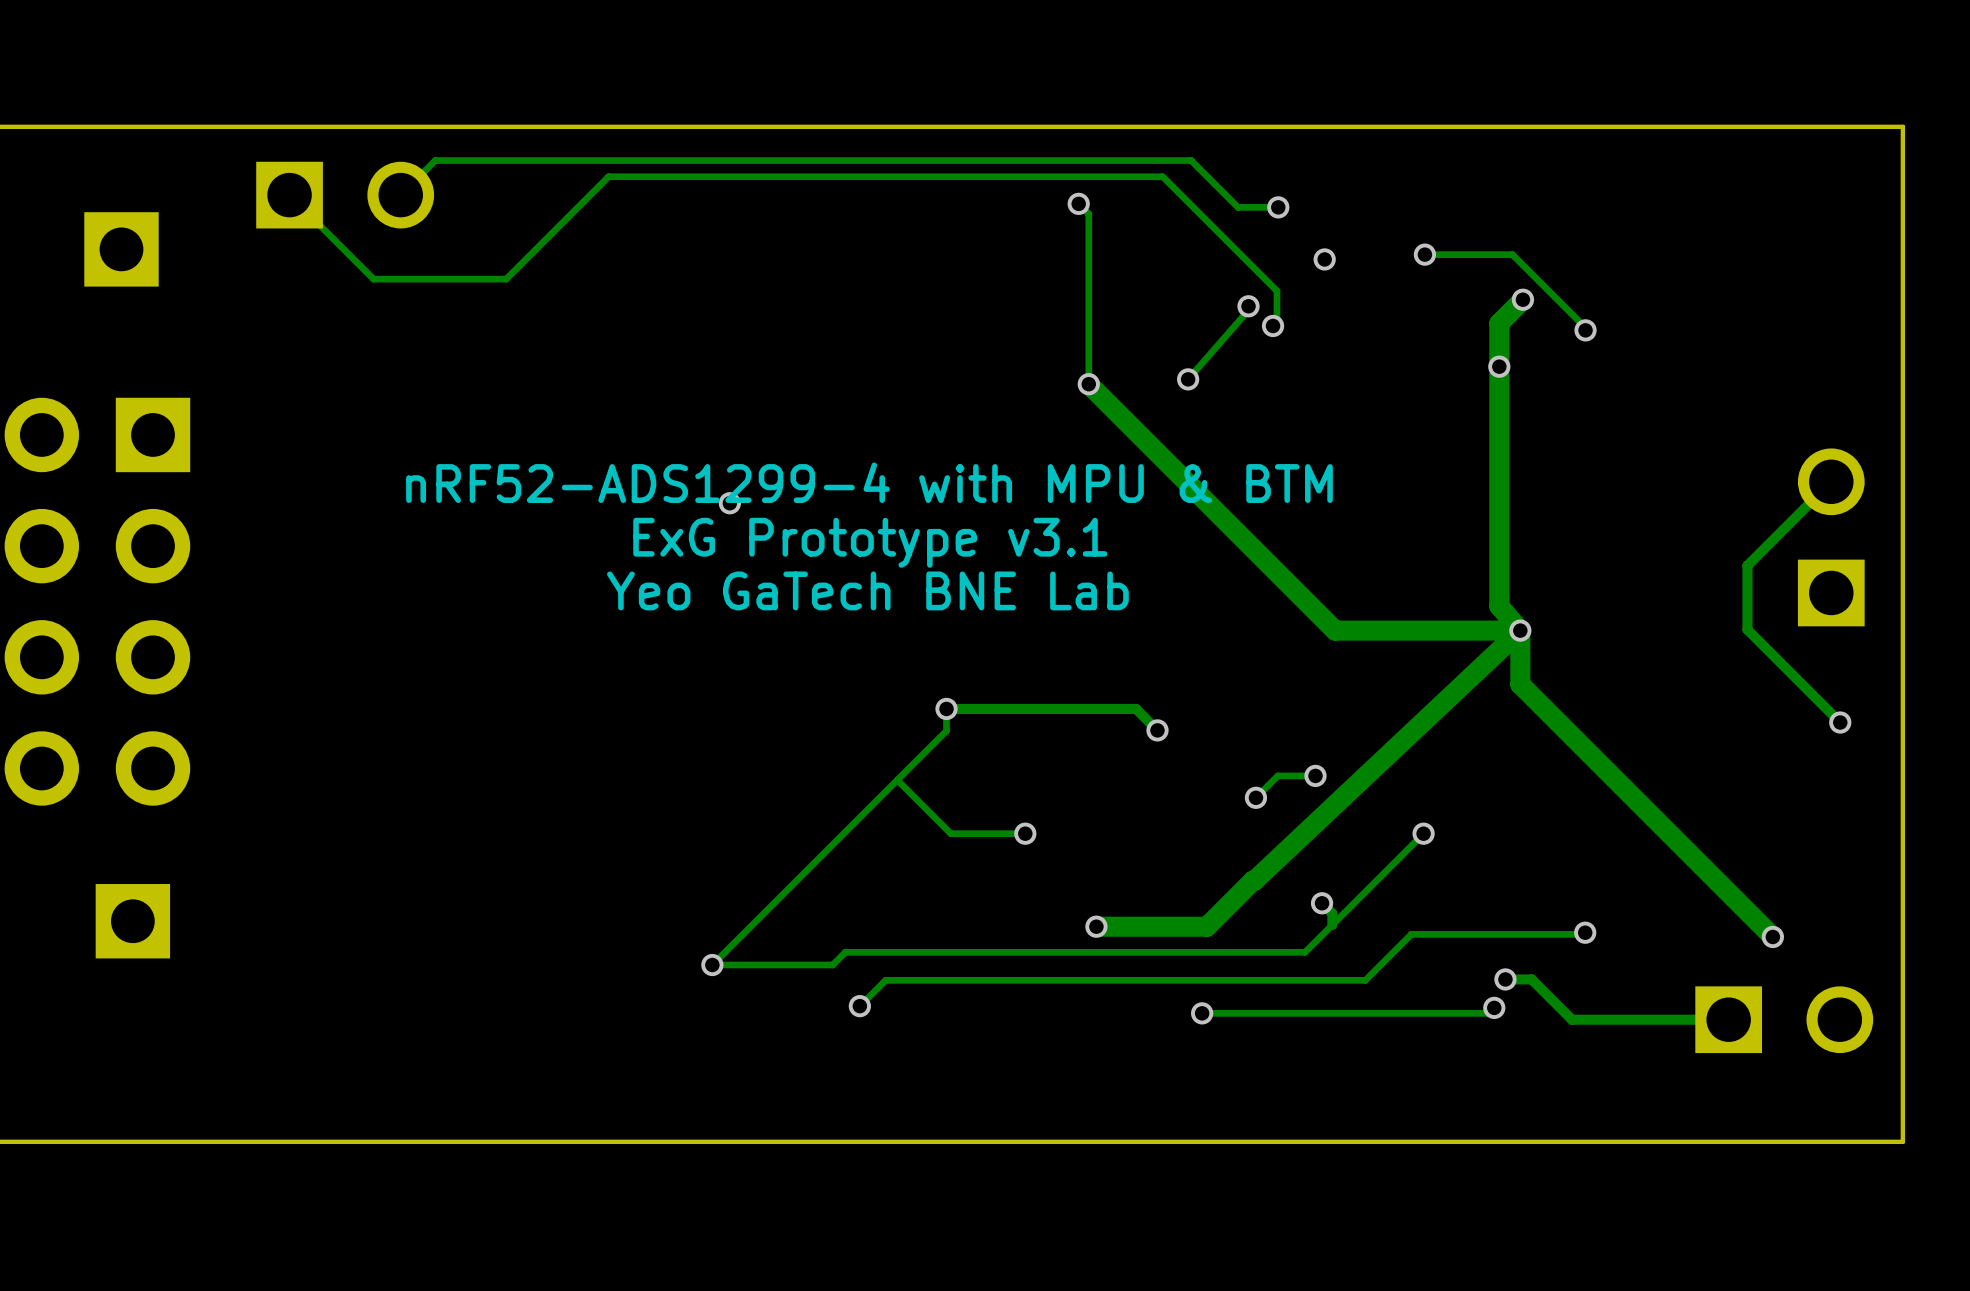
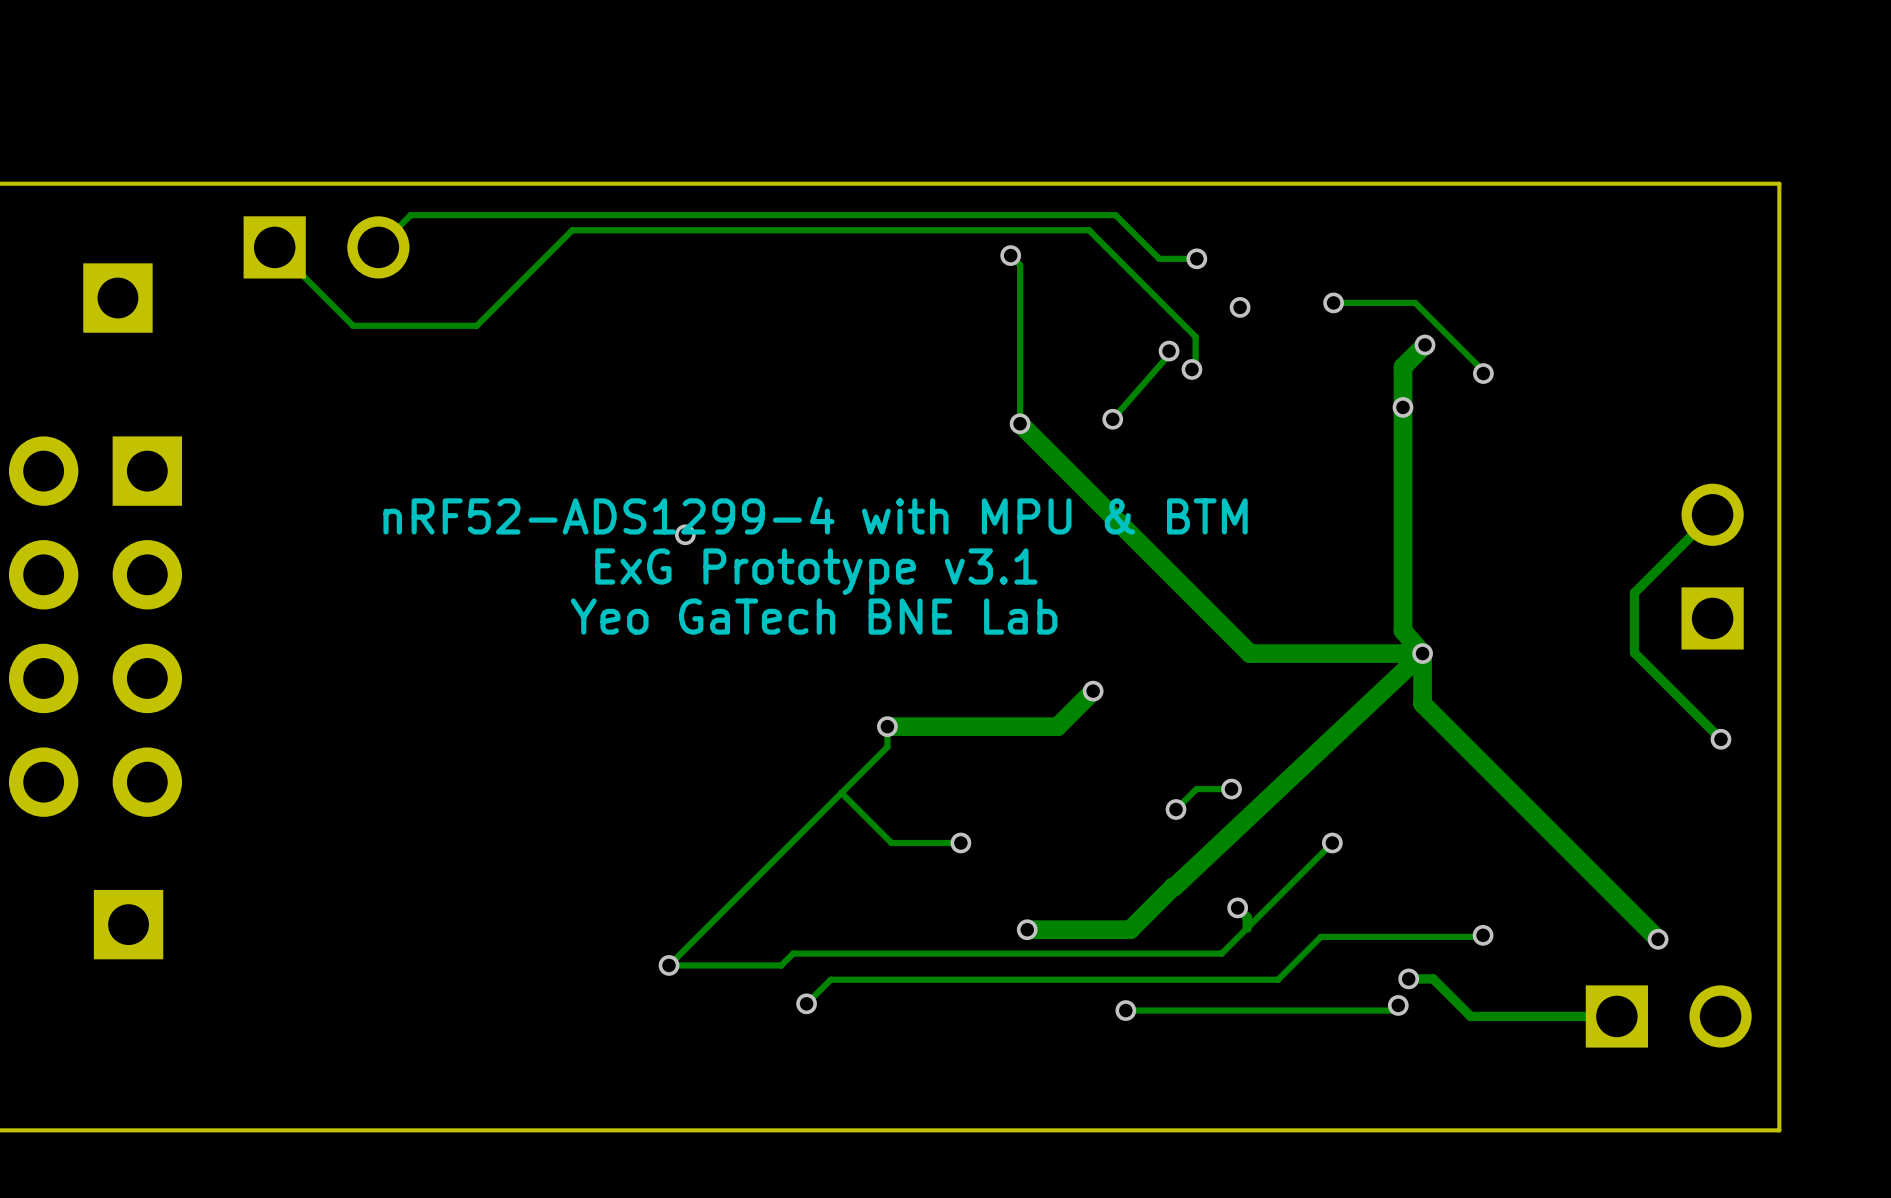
track: (1129, 708) (1136, 708) (1157, 730) -> (1057, 726) (1093, 691)
track width: thin (1129, 708) (946, 708) -> thick (1057, 726) (887, 726)
via position: (1157, 730) -> (1093, 691)

